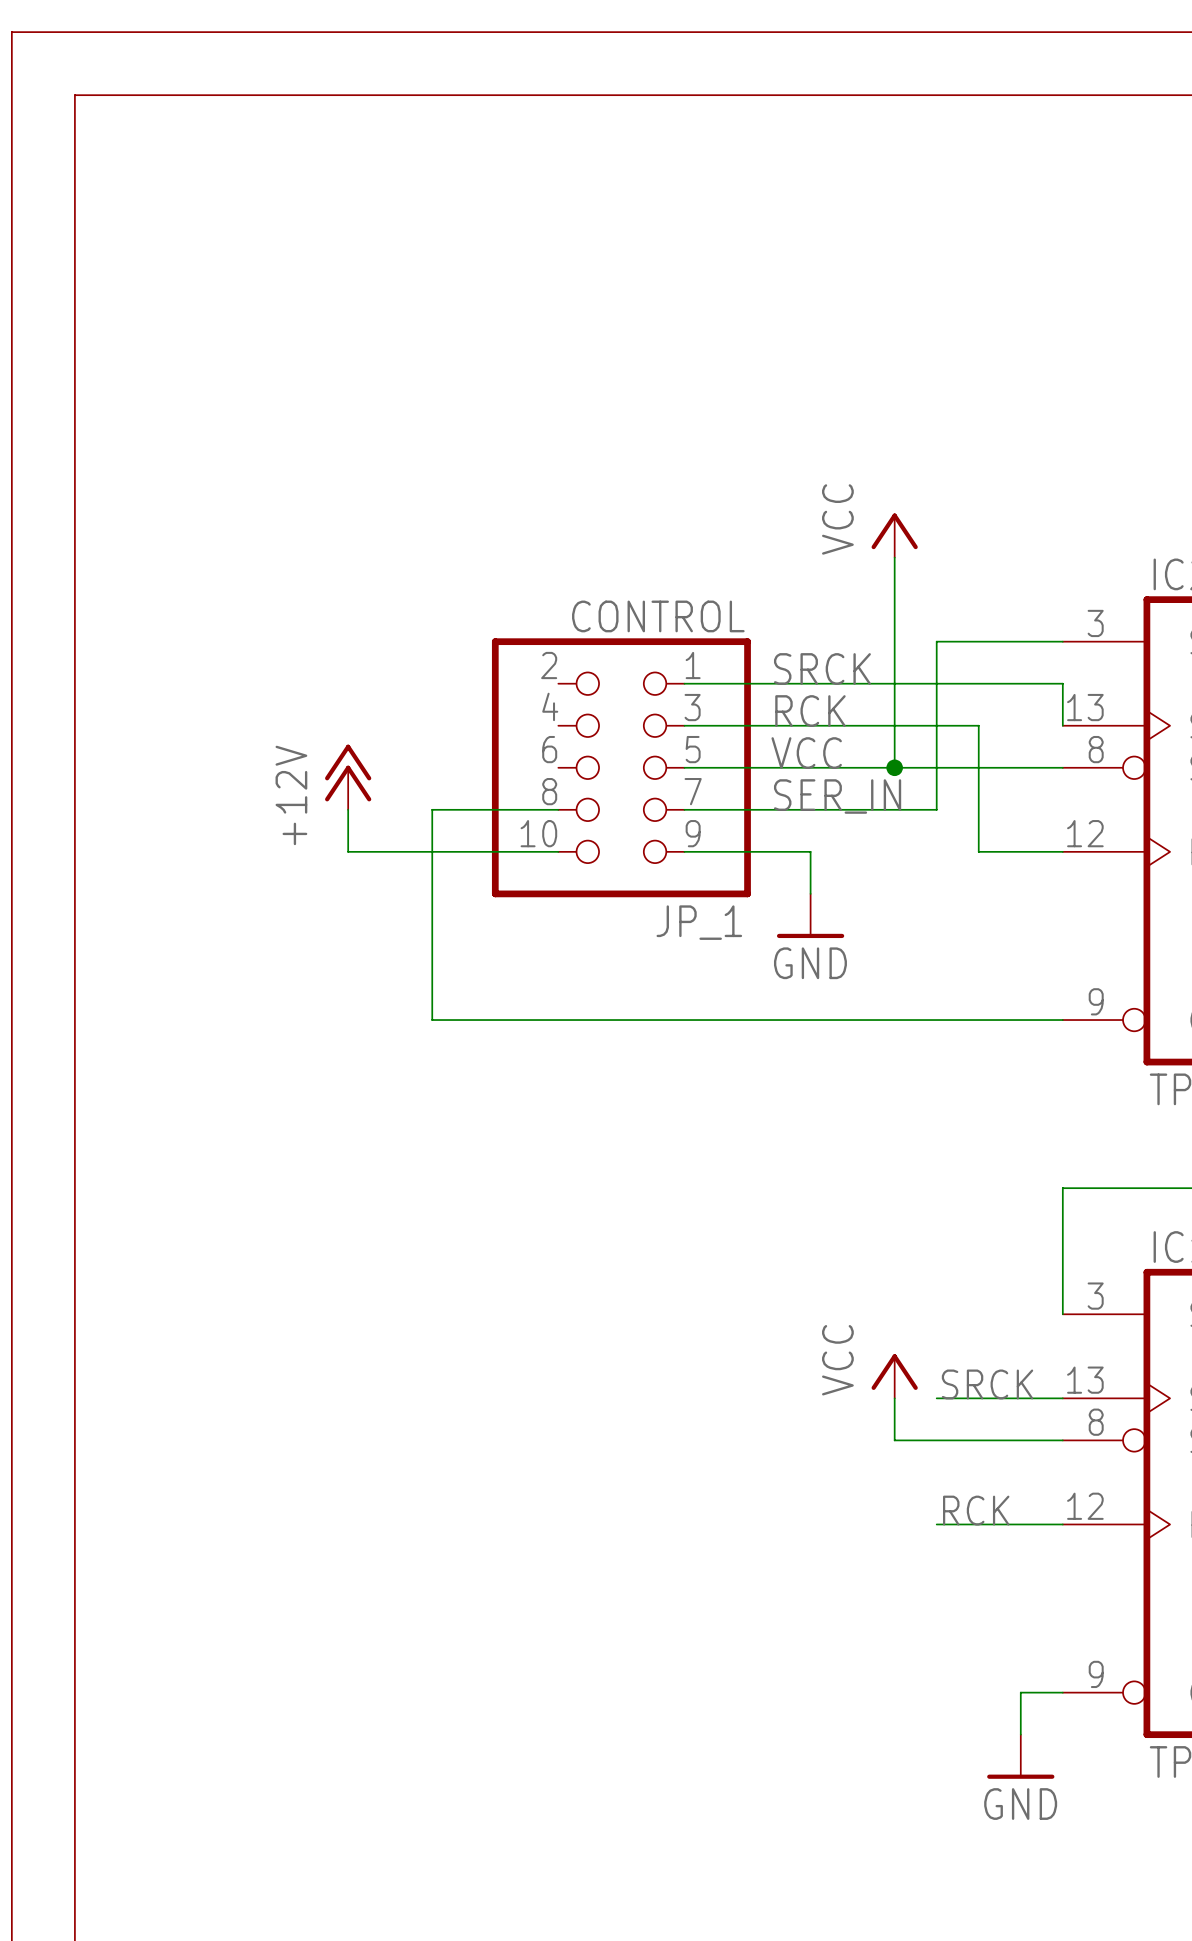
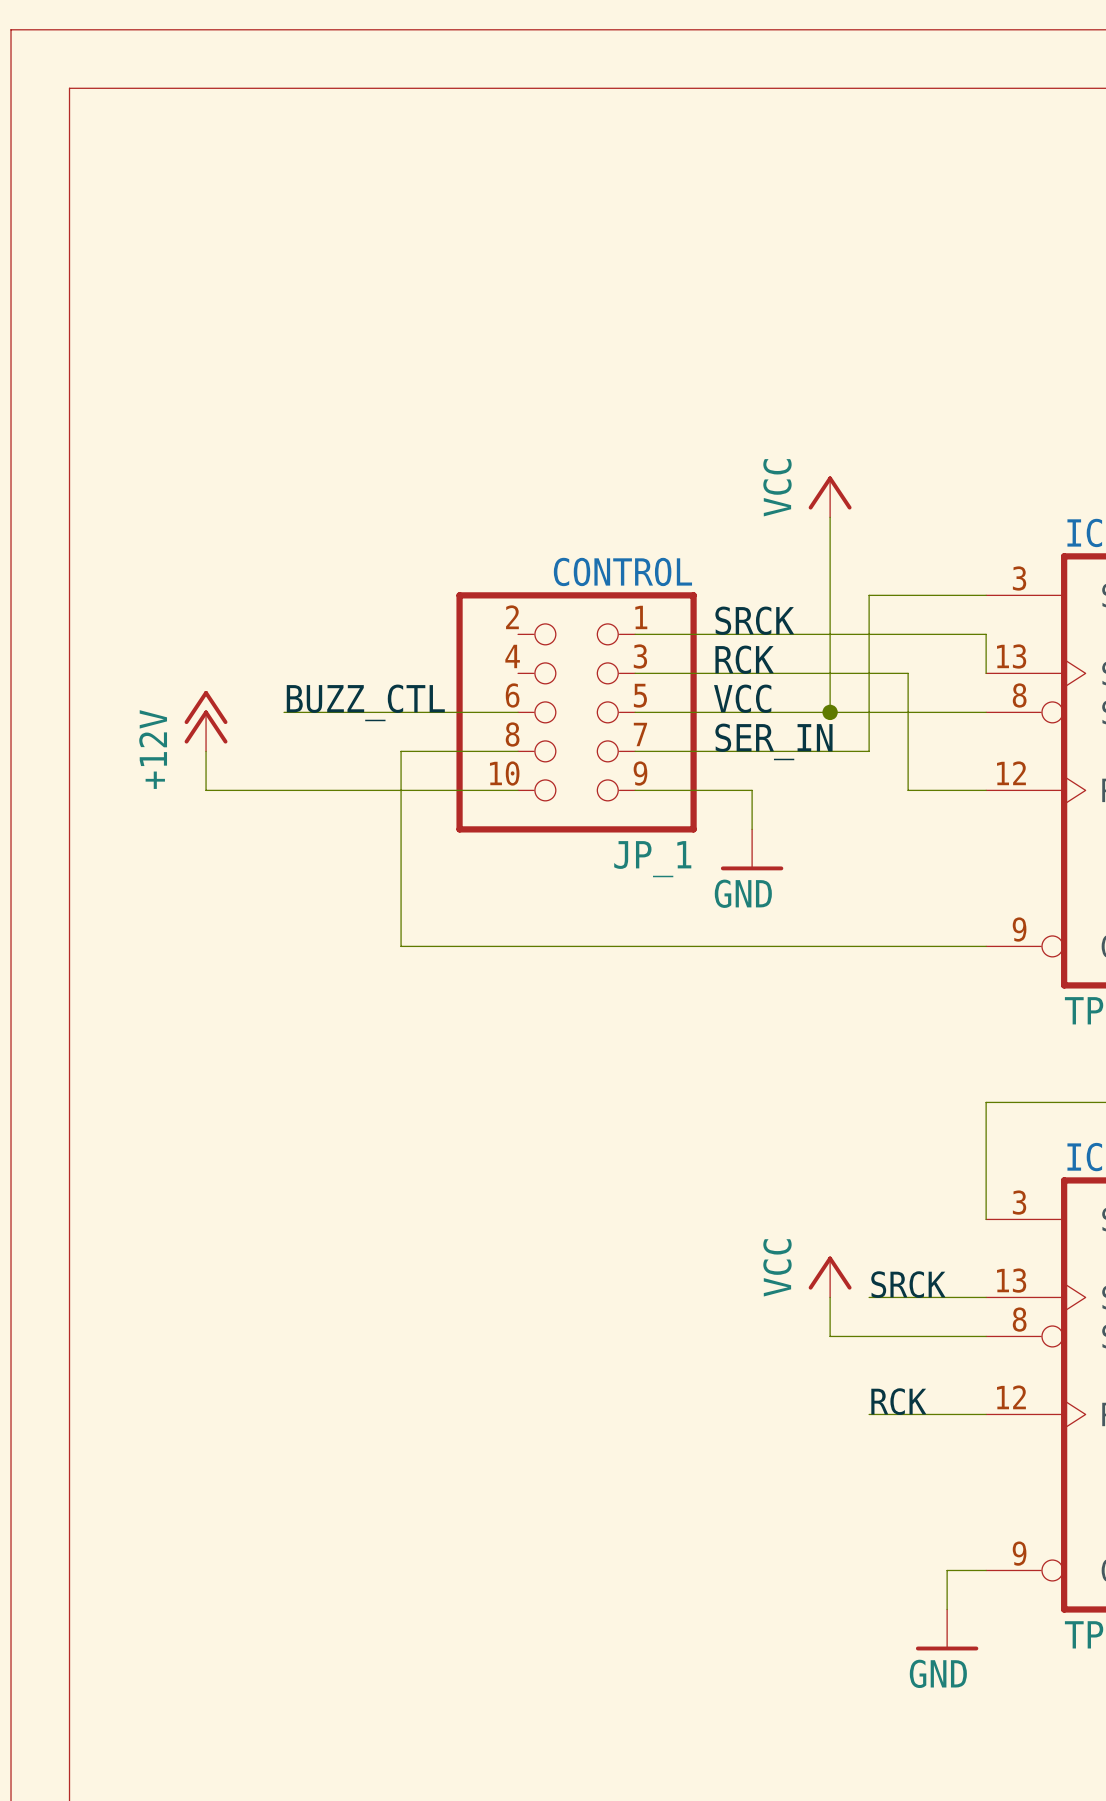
label: none -> BUZZ_CTL (365, 702)
wire: none -> (284, 712) (518, 712)
power symbol position: +12V (348, 777) -> +12V (206, 721)
wire: (348, 809) (348, 851) -> (206, 751) (206, 790) (323, 790)

